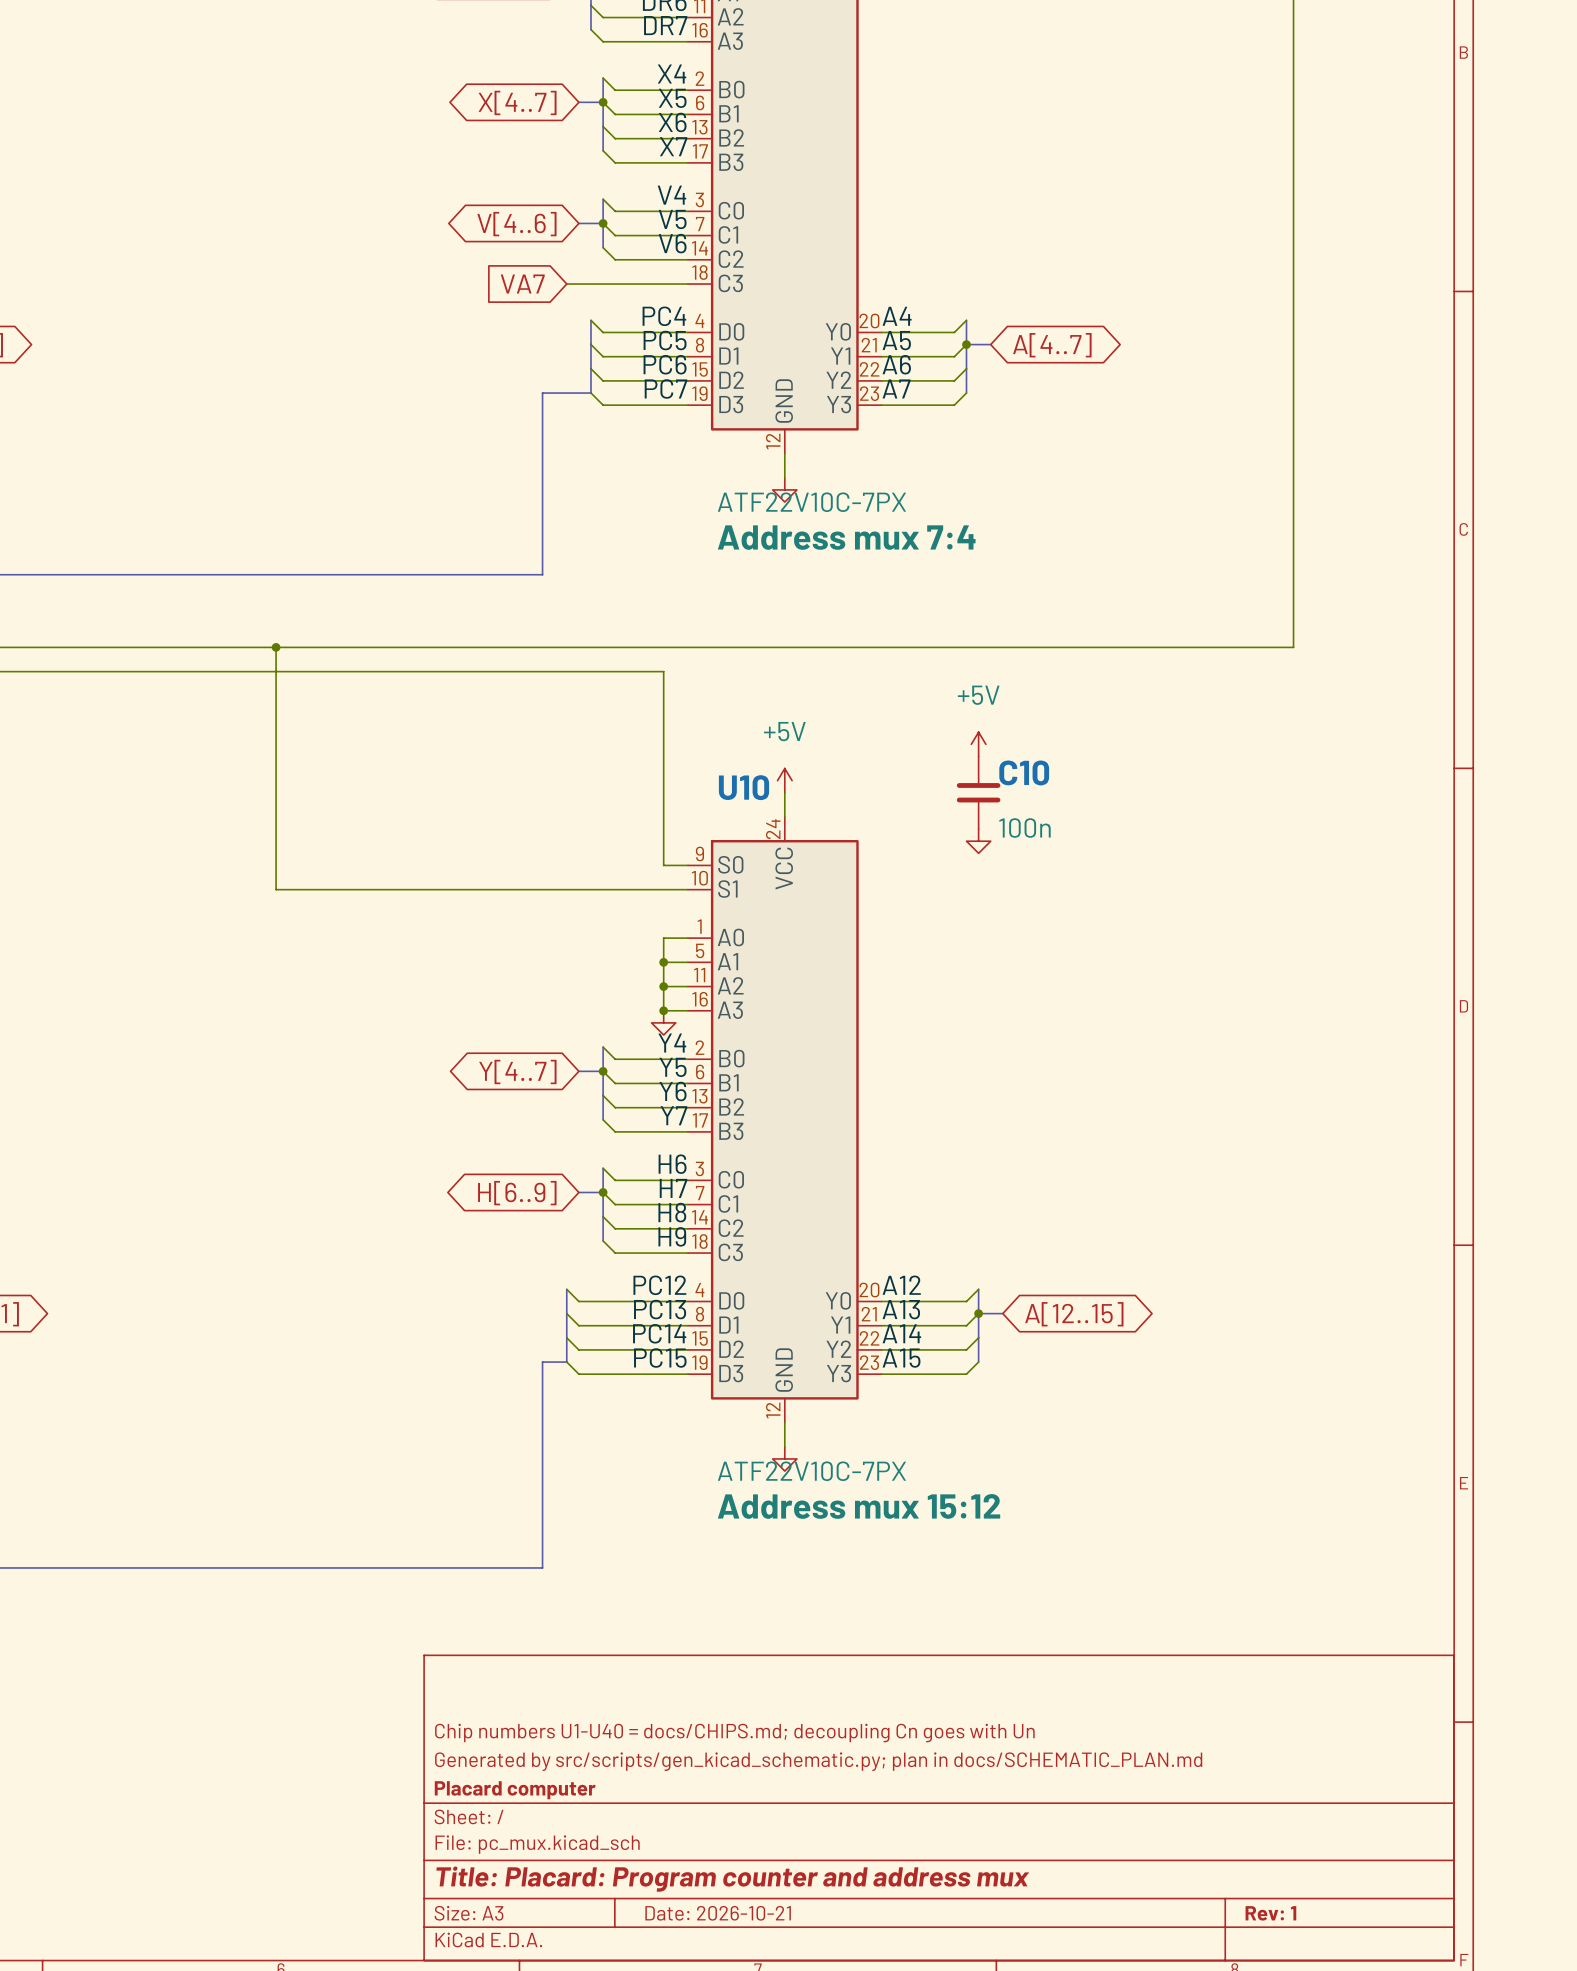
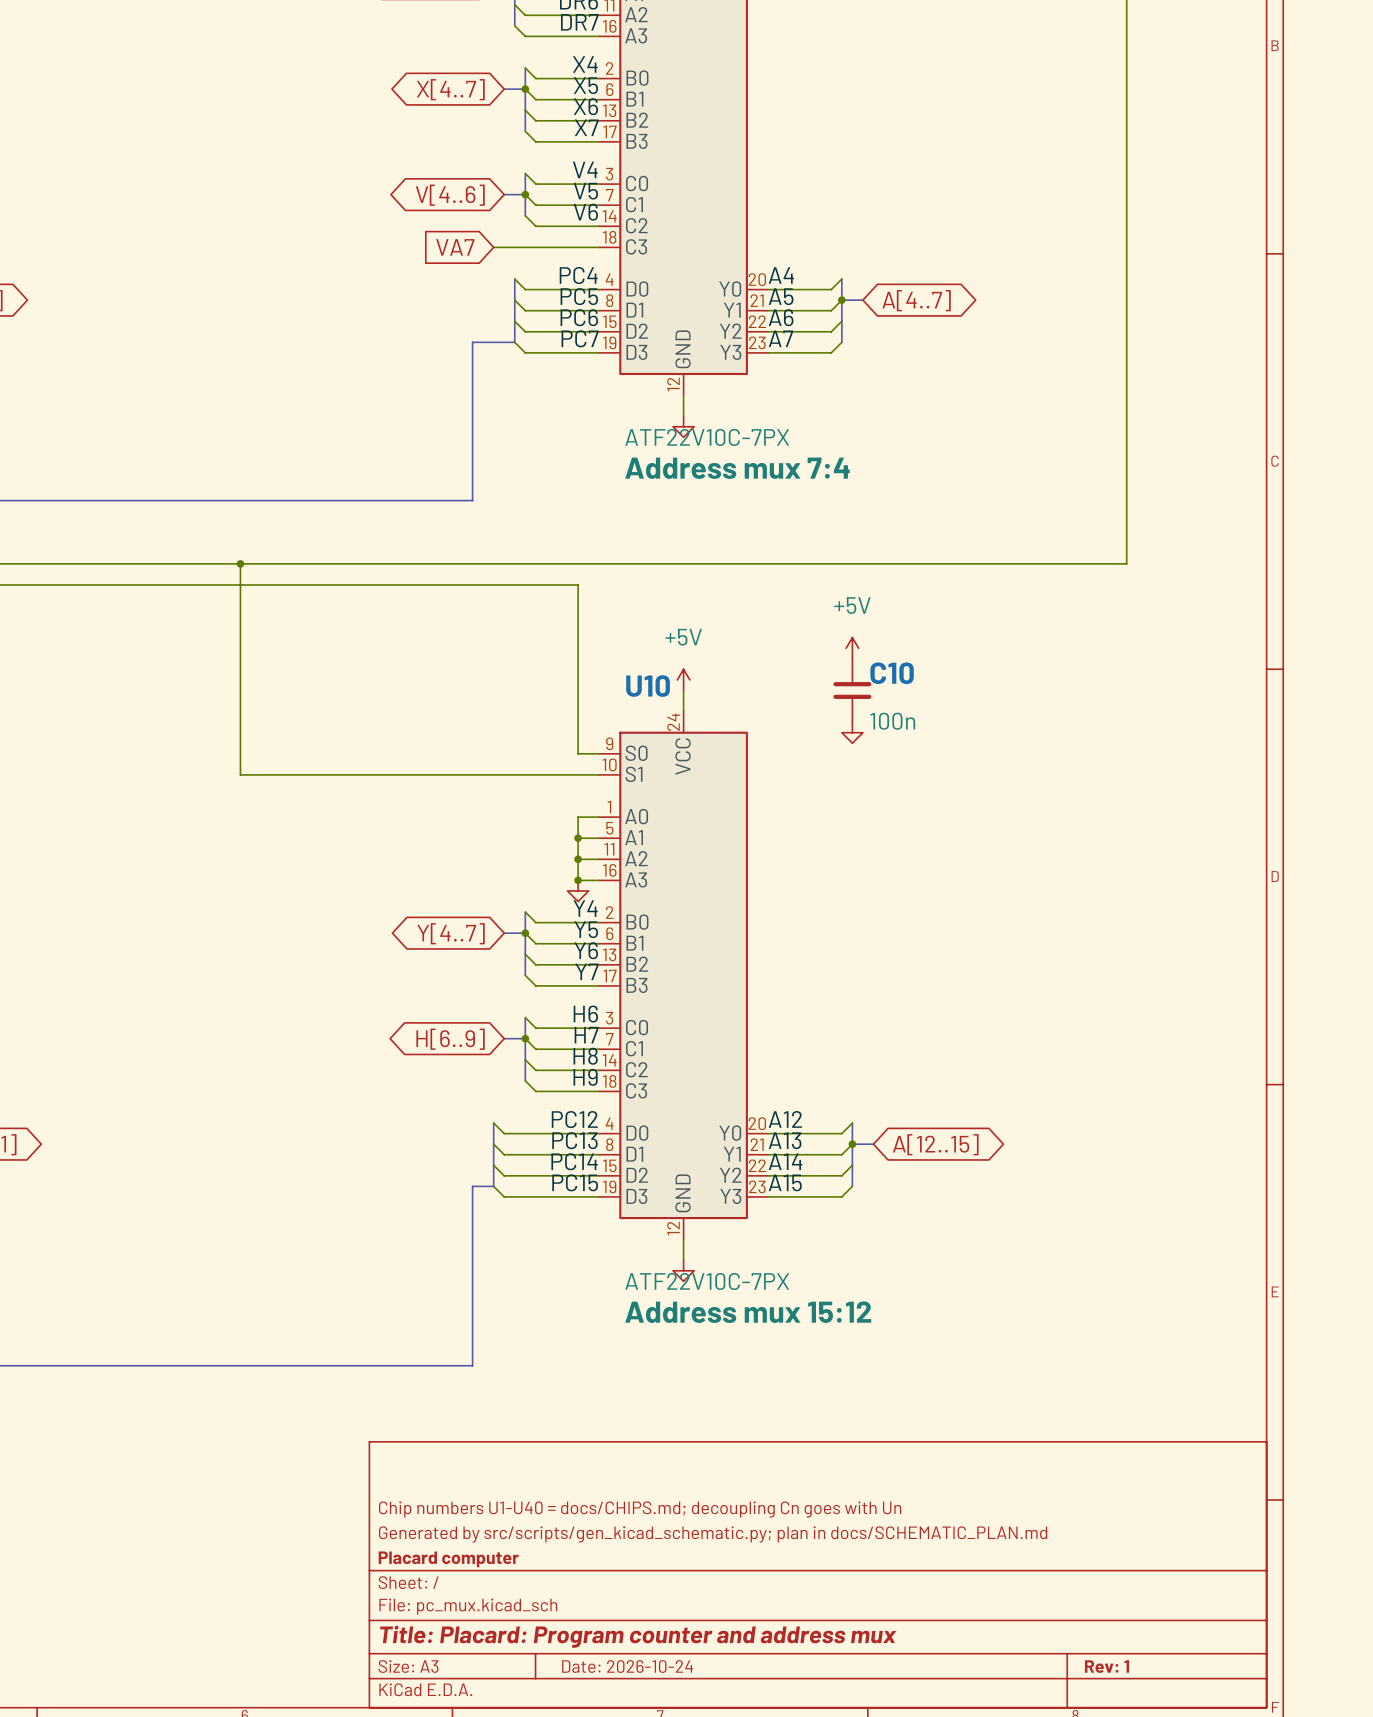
title block: Date: 2026-10-21 (718, 1913) -> Date: 2026-10-24 (627, 1666)

